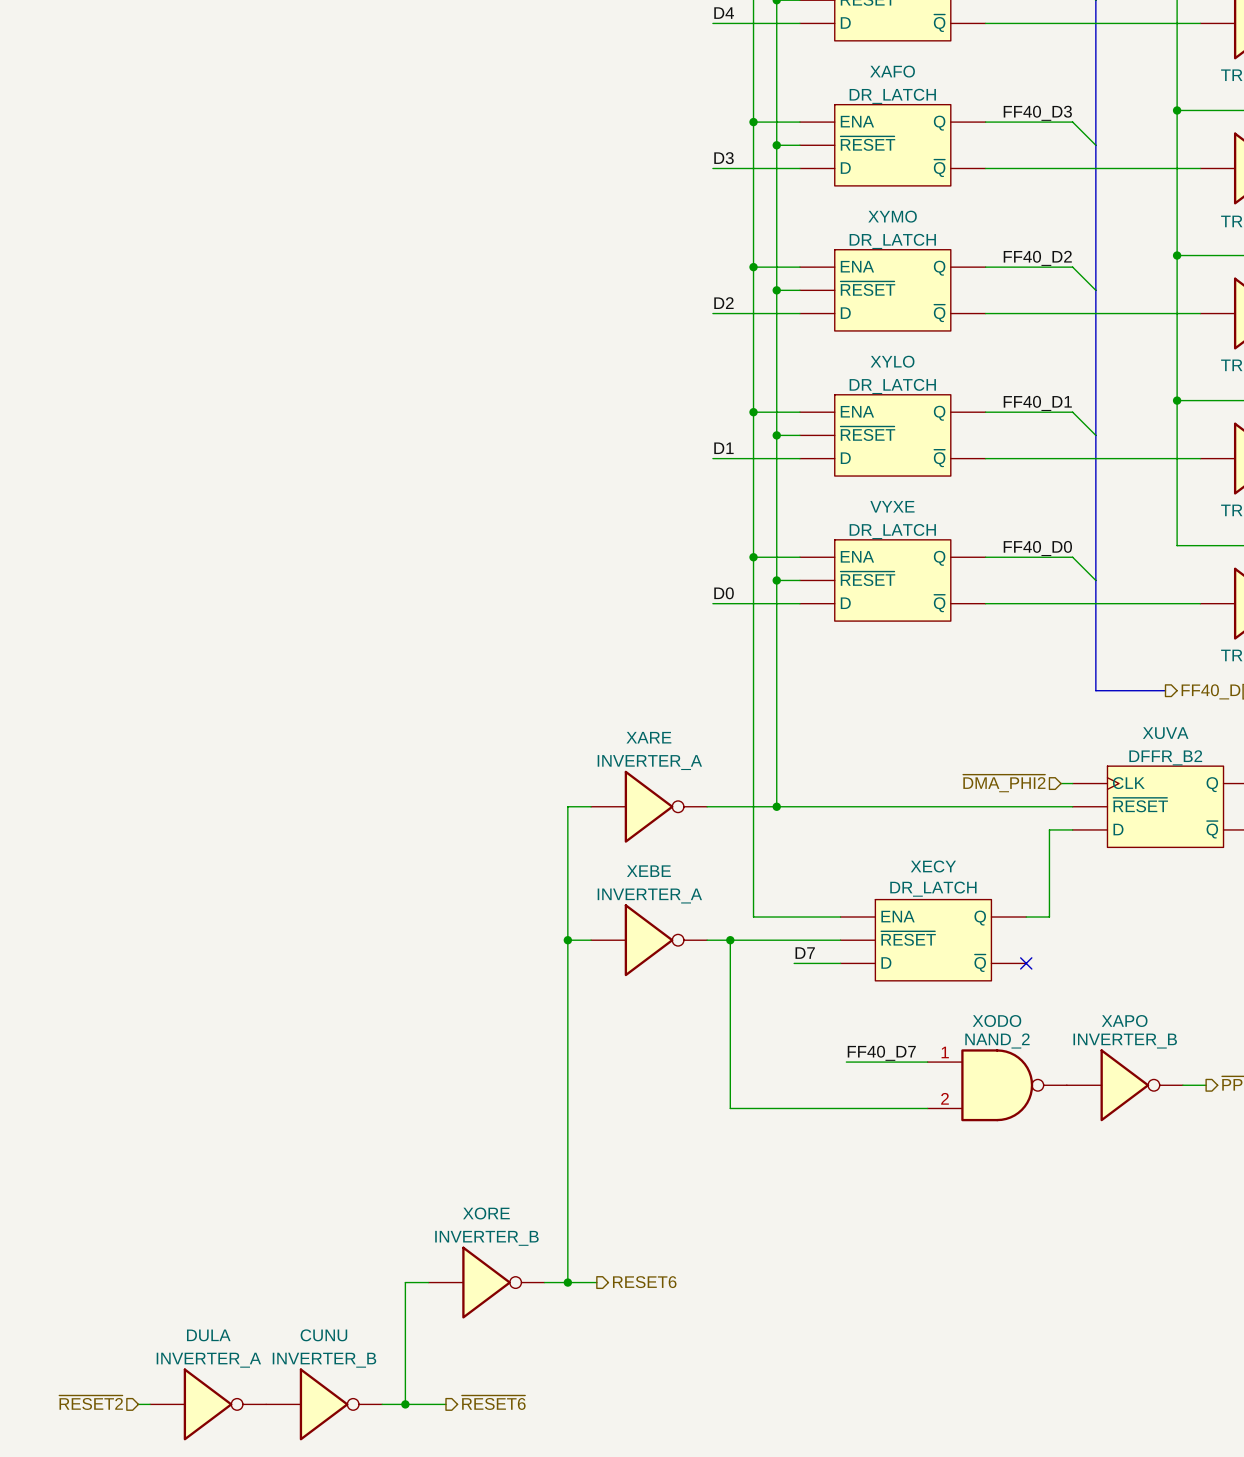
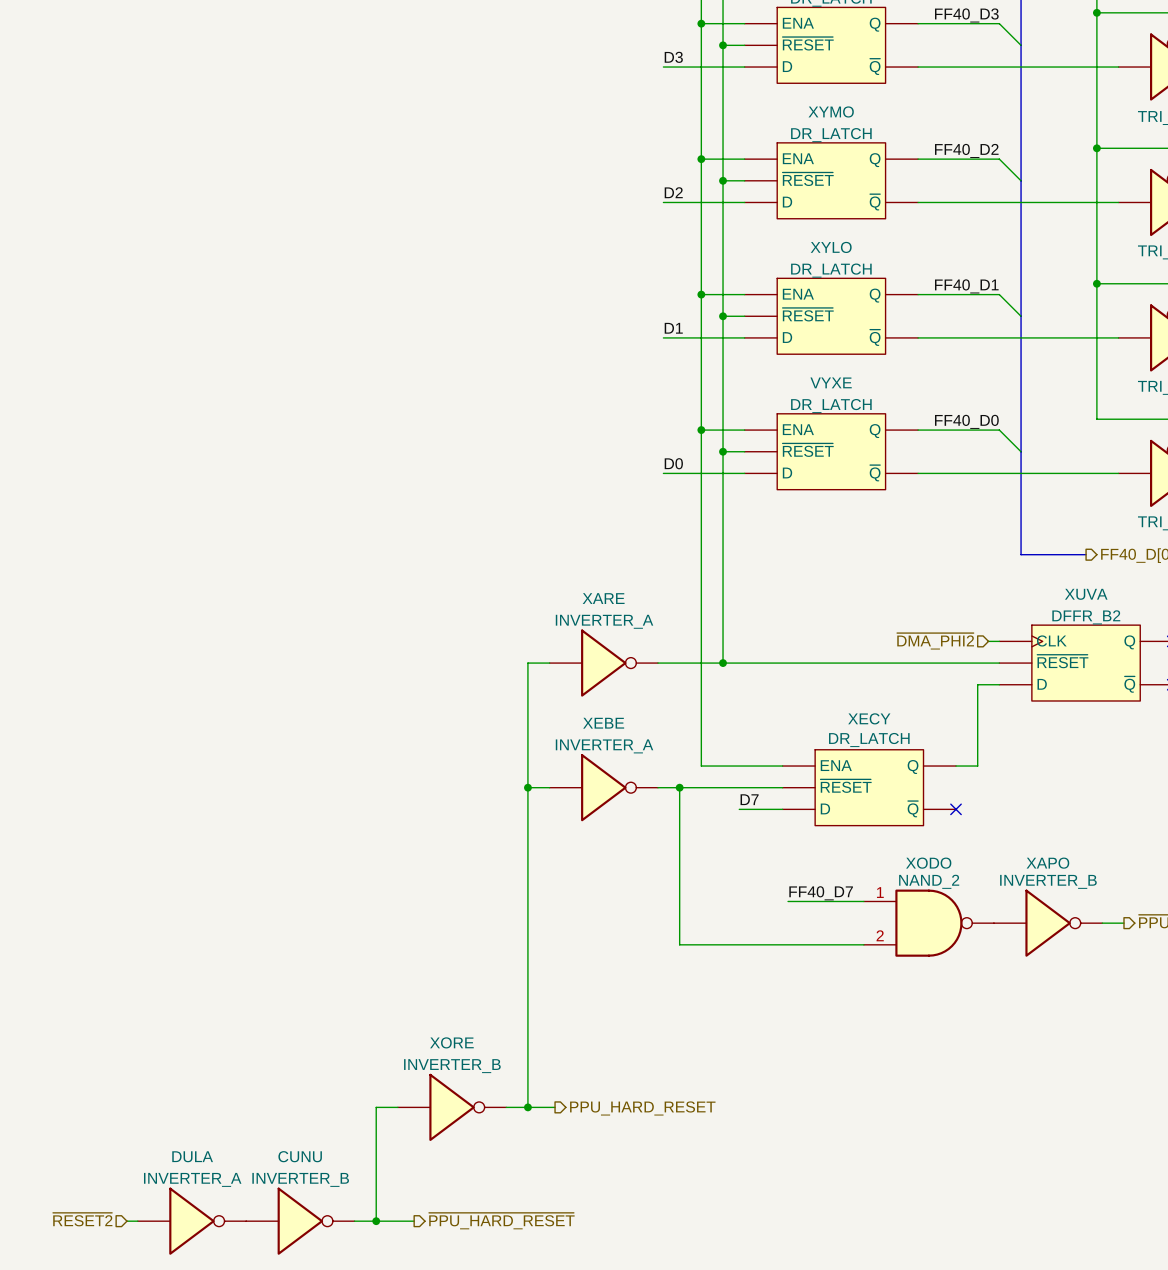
hierarchical label: RESET6 (644, 1282) -> PPU_HARD_RESET (642, 1108)
hierarchical label: ~{RESET6} (493, 1402) -> ~{PPU_HARD_RESET} (501, 1221)

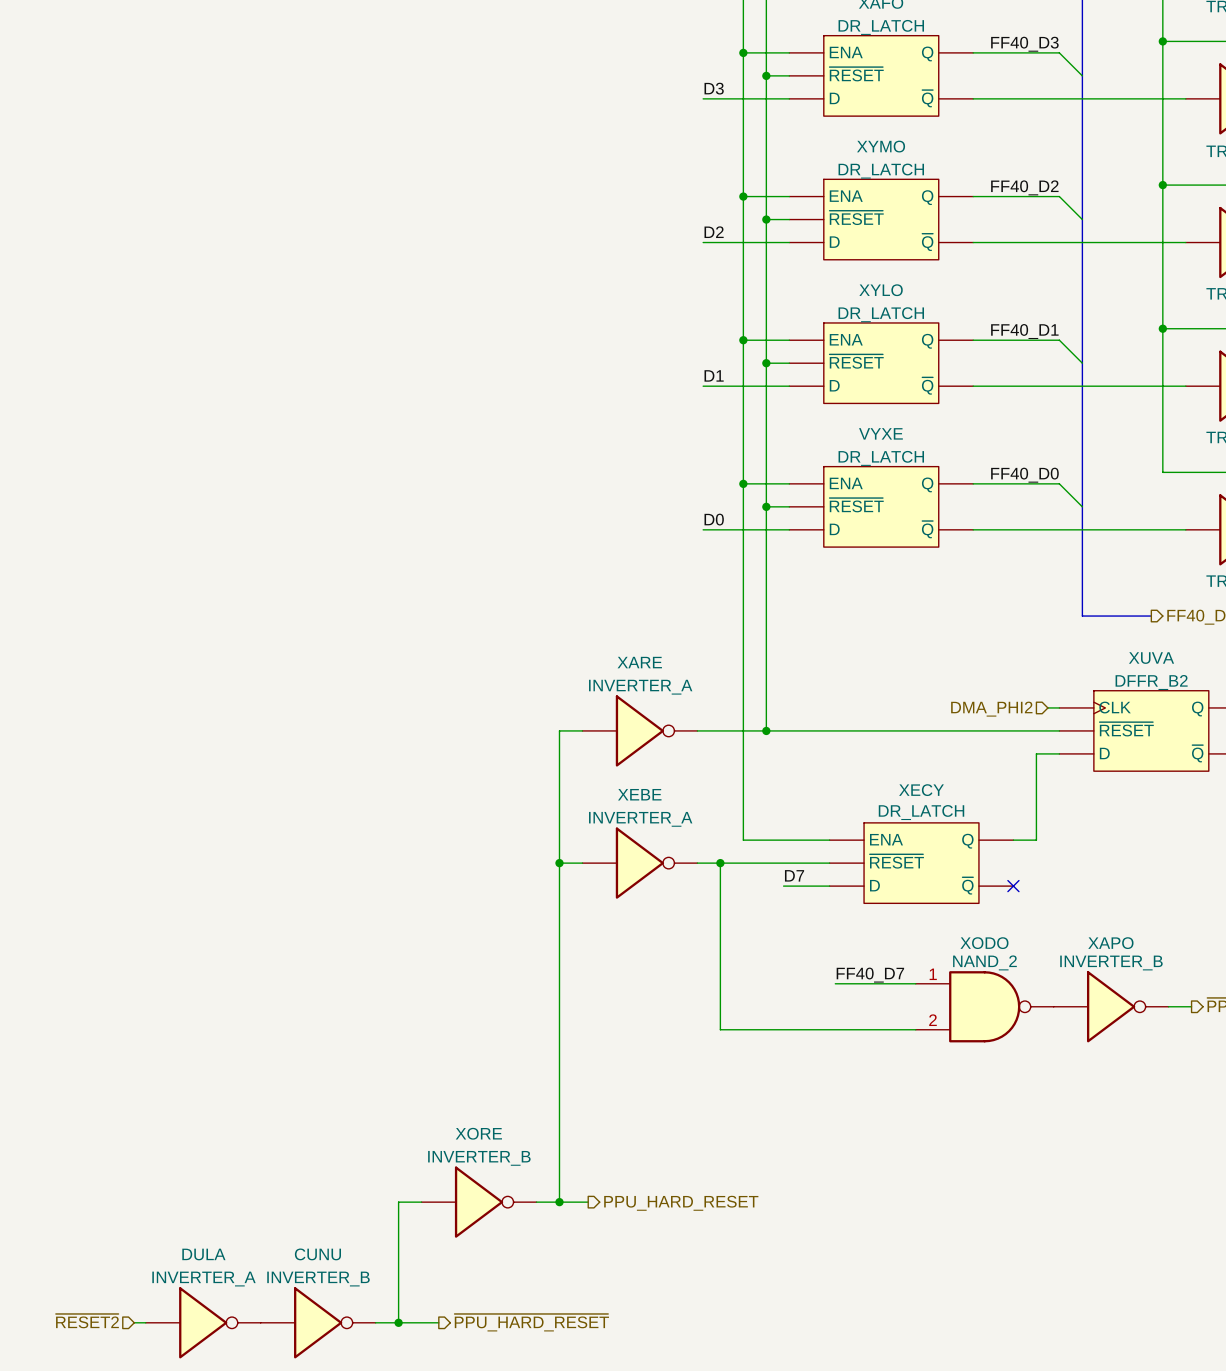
hierarchical label: ~{DMA_PHI2} (935, 641) -> DMA_PHI2 (991, 709)

